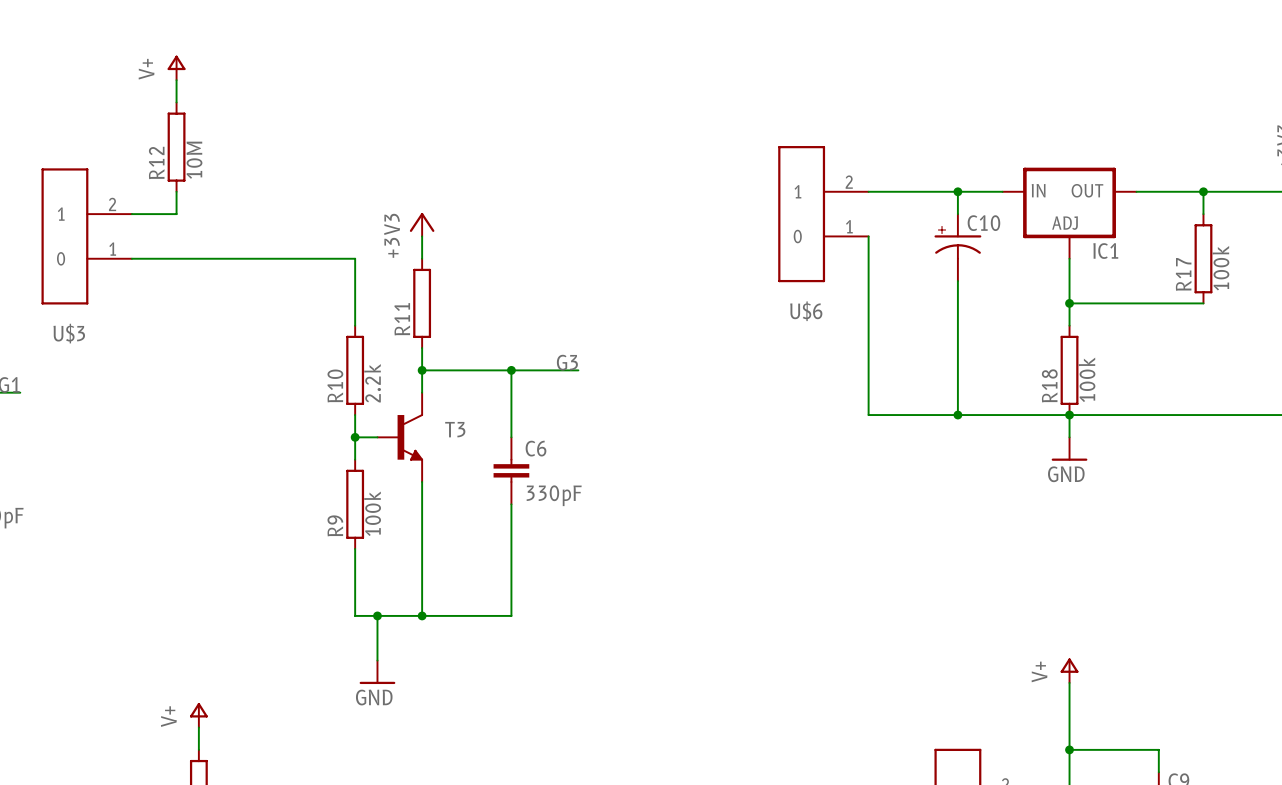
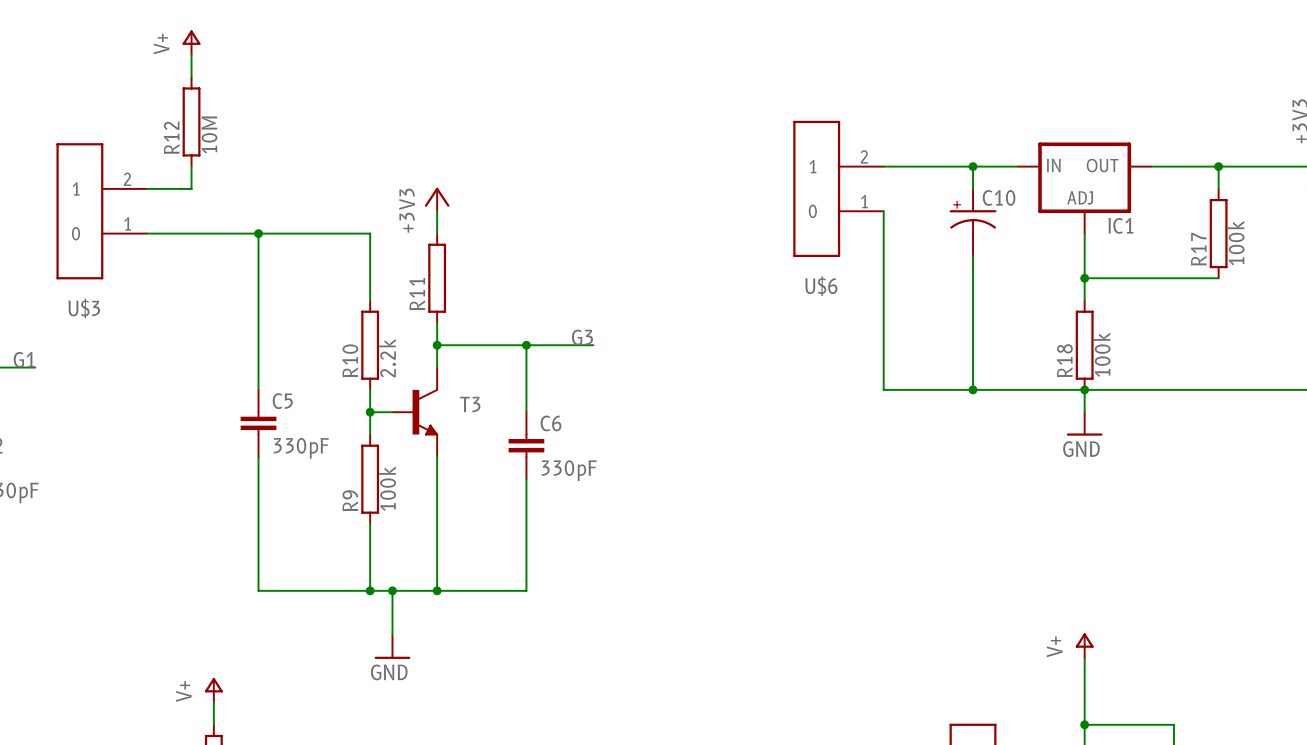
wire: none -> (258, 233) (258, 389)
junction: none -> (258, 233)
C5: none -> 330pF (258, 423)
wire: none -> (258, 456) (258, 590) (370, 590)
junction: none -> (370, 590)

